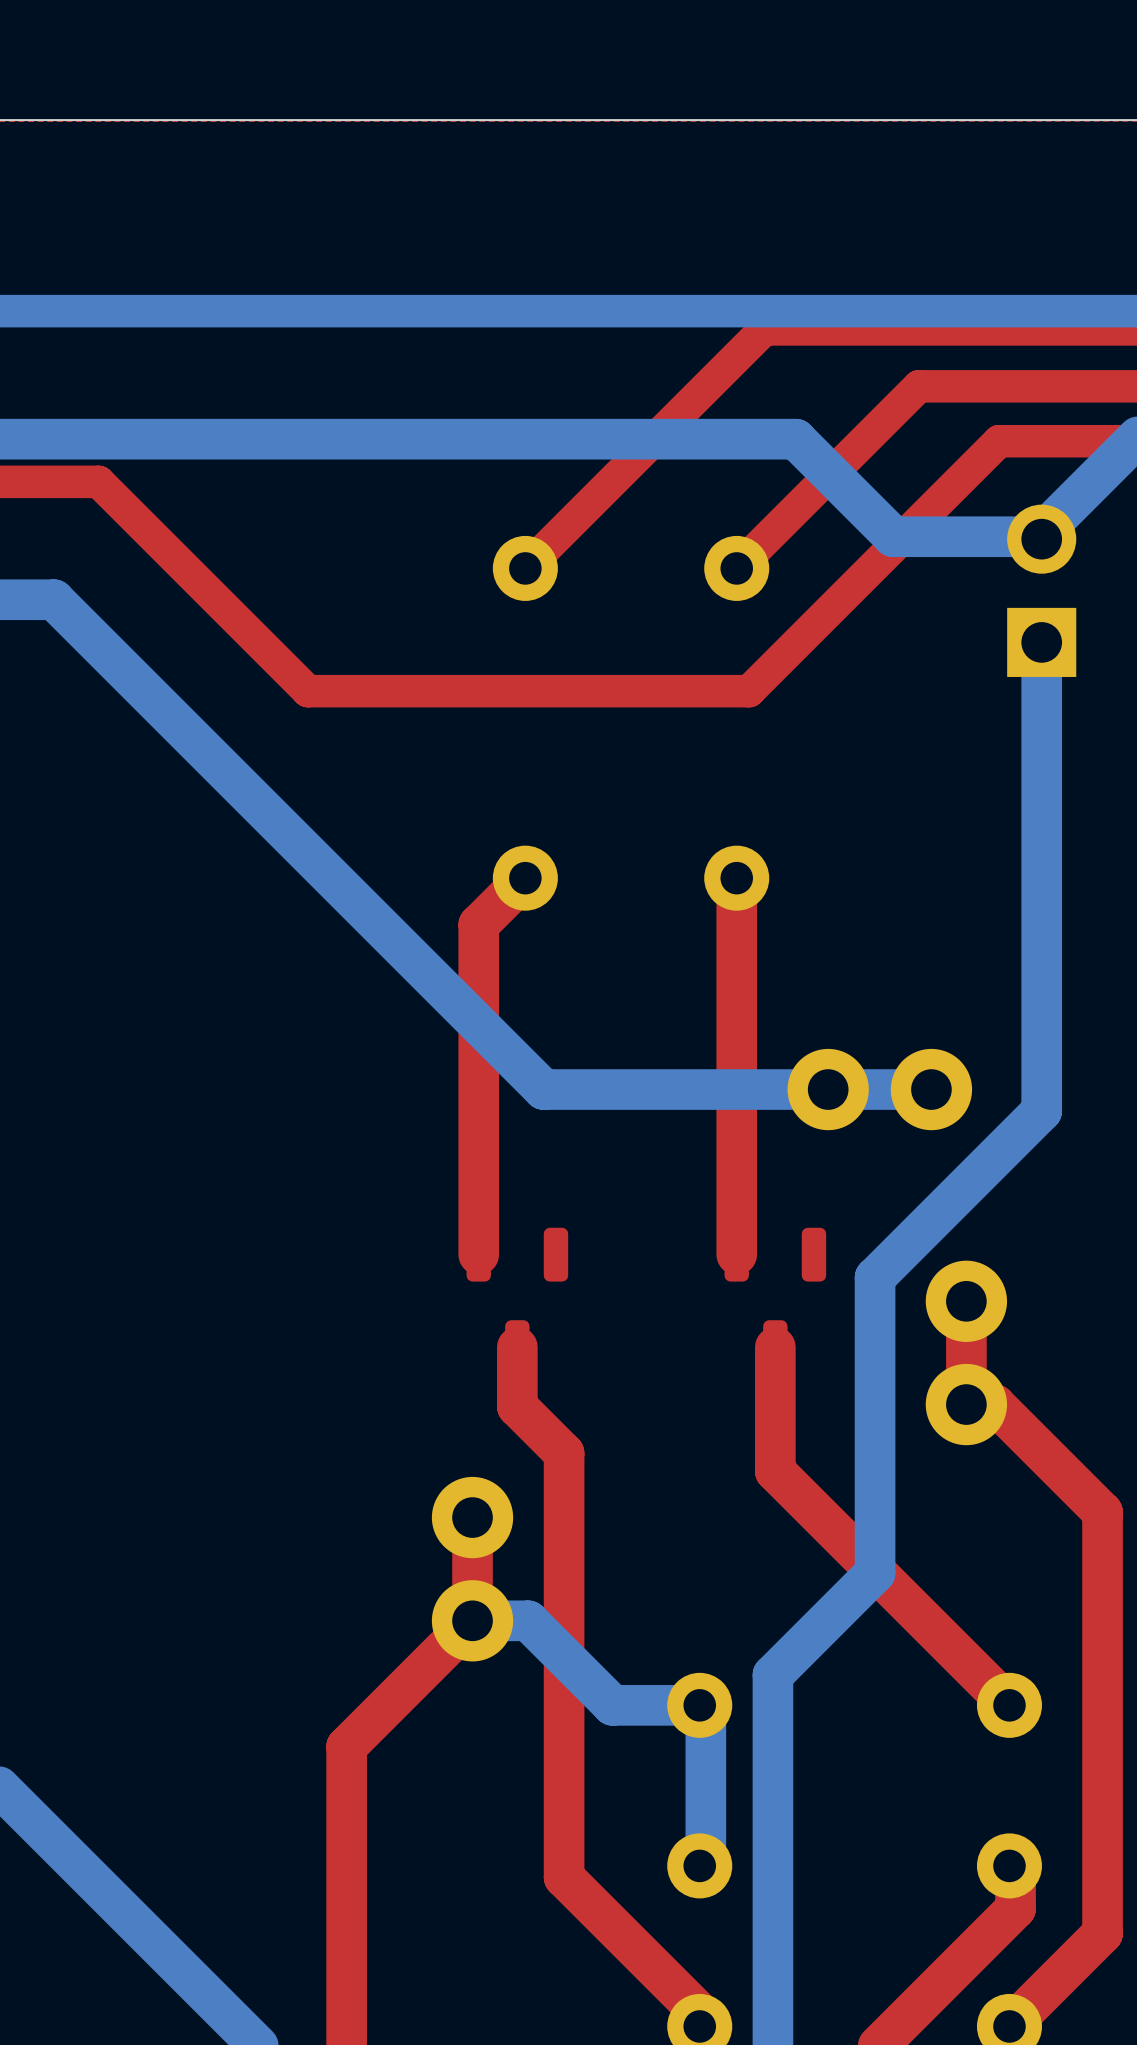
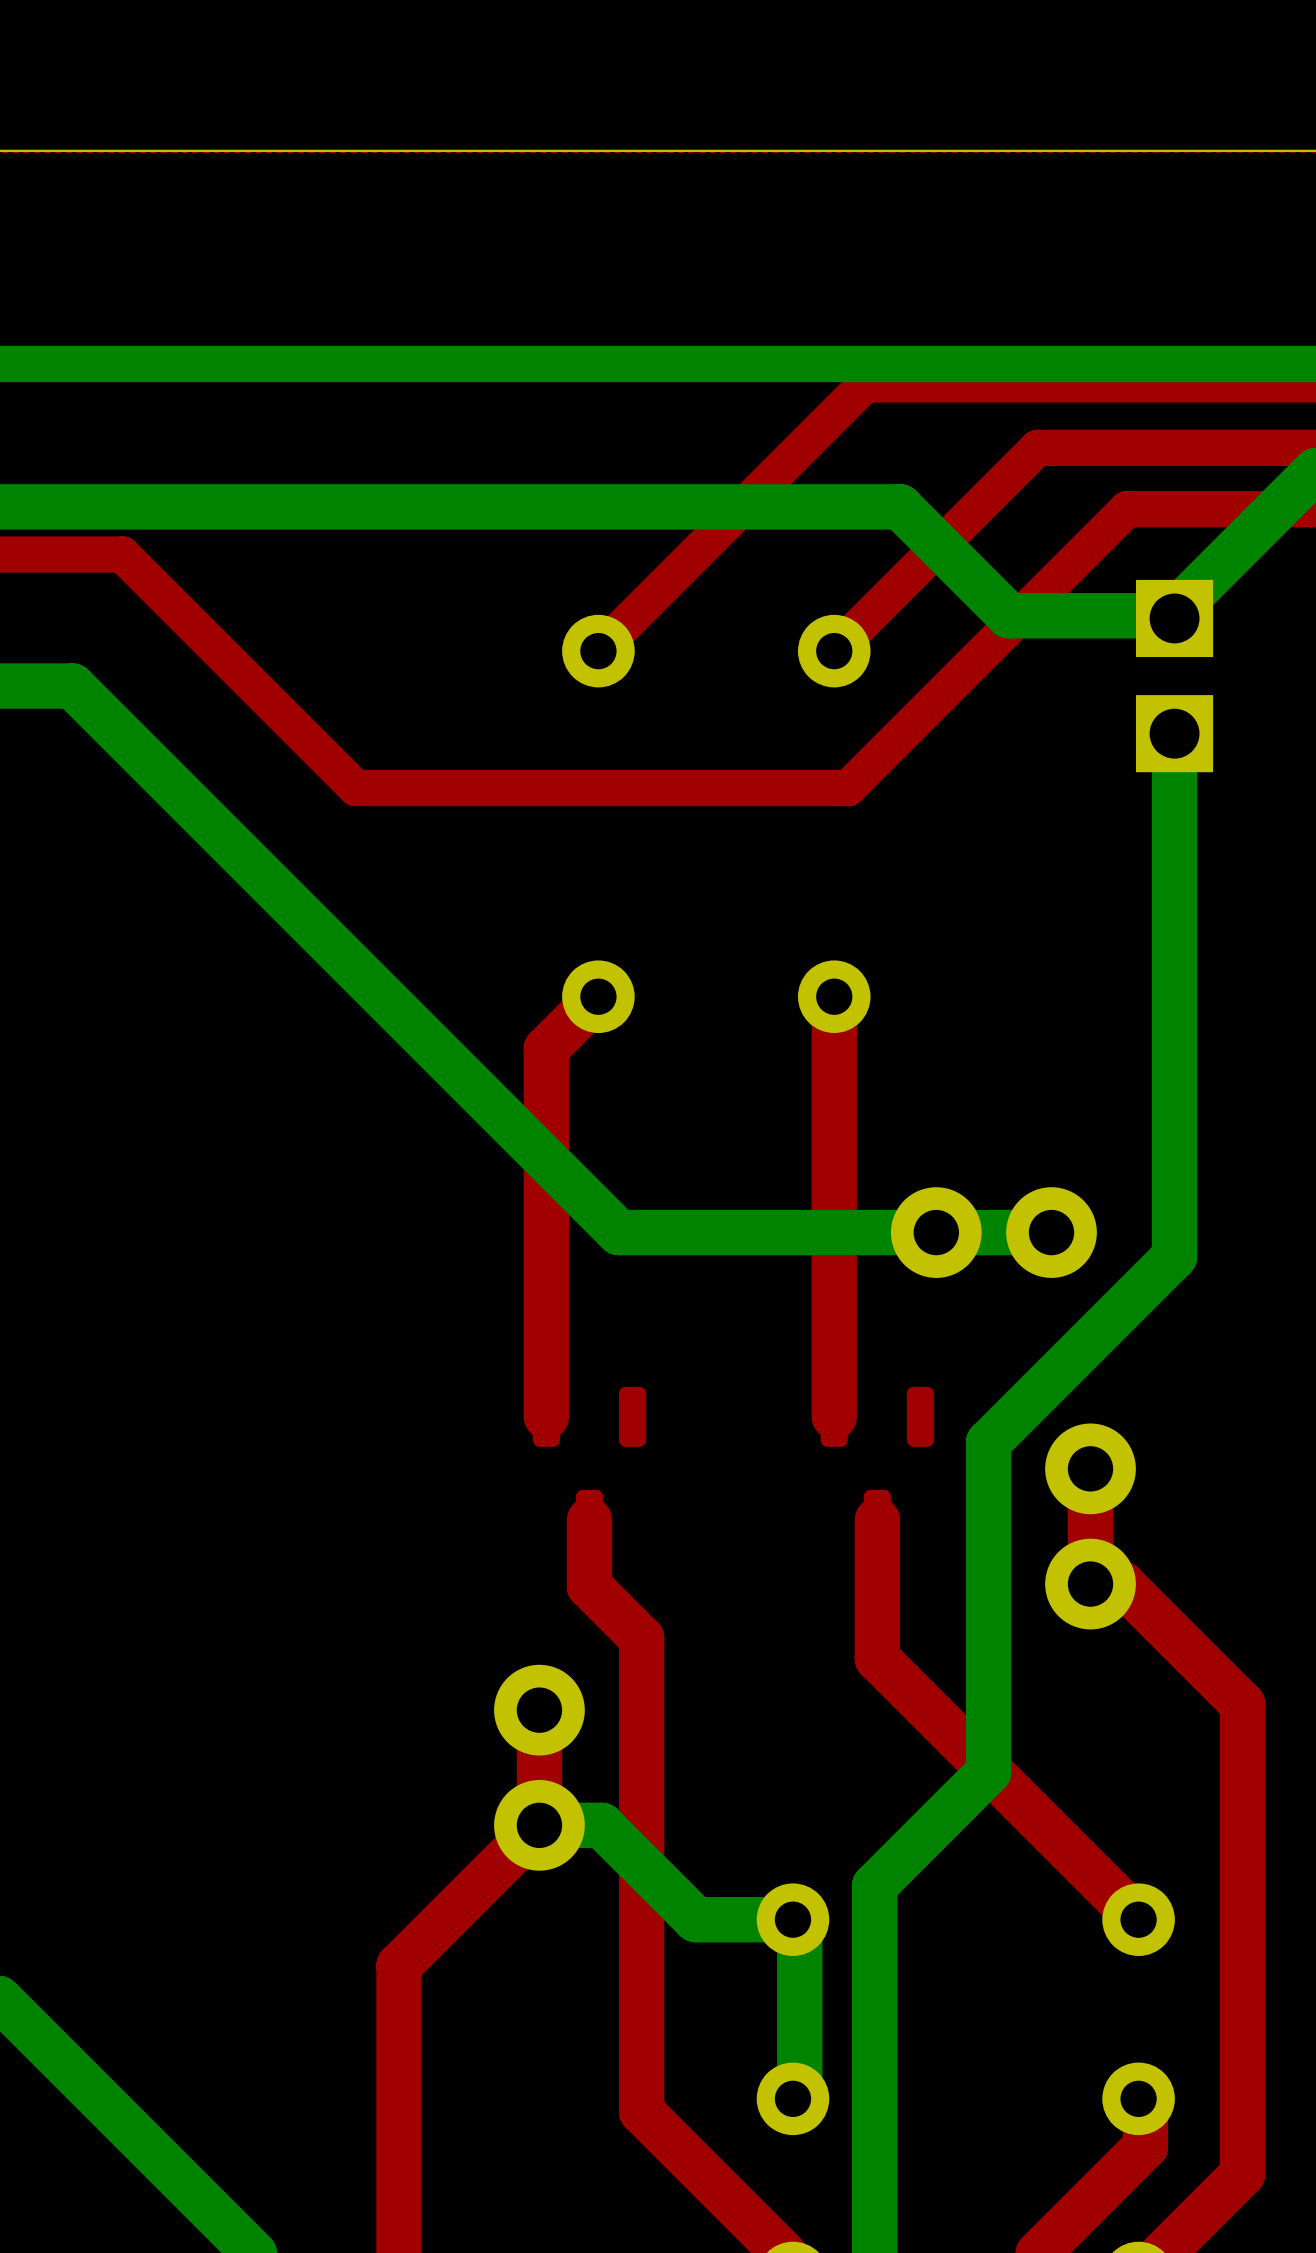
part footprint: [1007, 504, 1077, 677] -> [1136, 579, 1214, 773]

